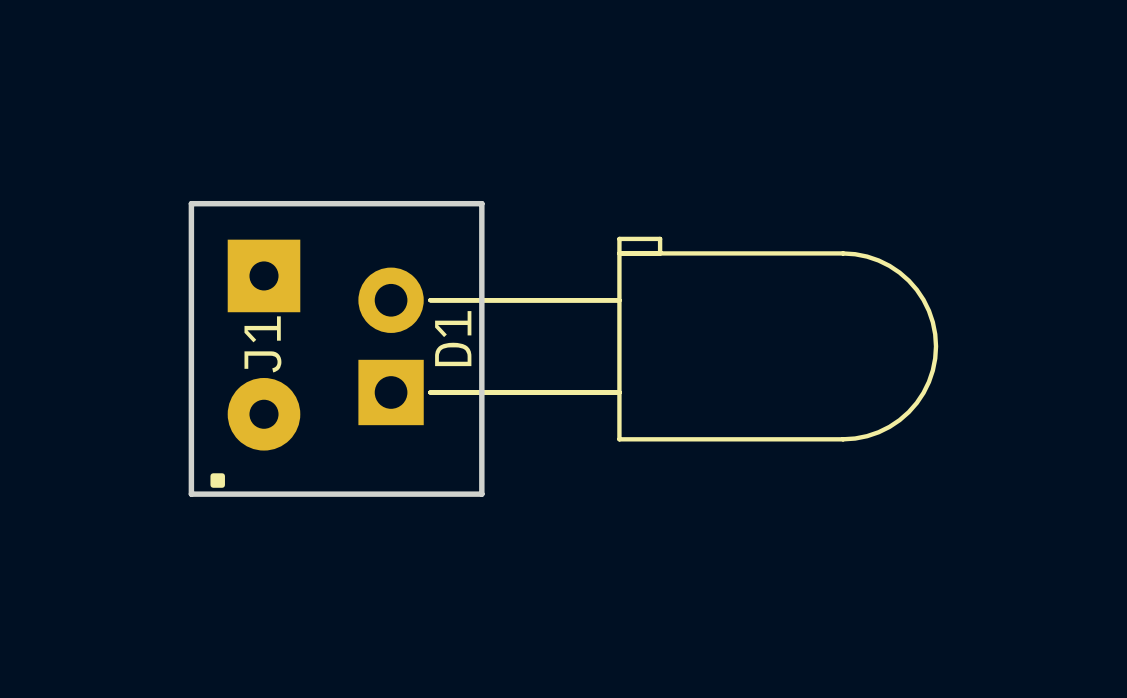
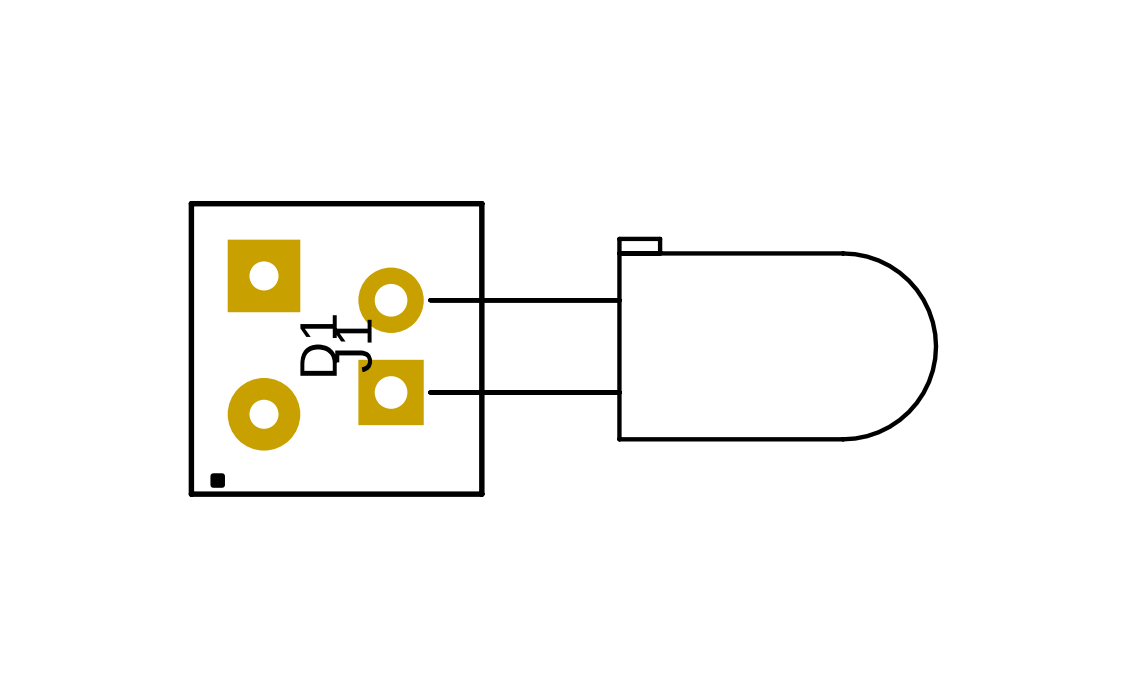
D1 name position: D1 (453, 338) -> D1 (318, 345)
J1 name position: J1 (262, 344) -> J1 (353, 345)

